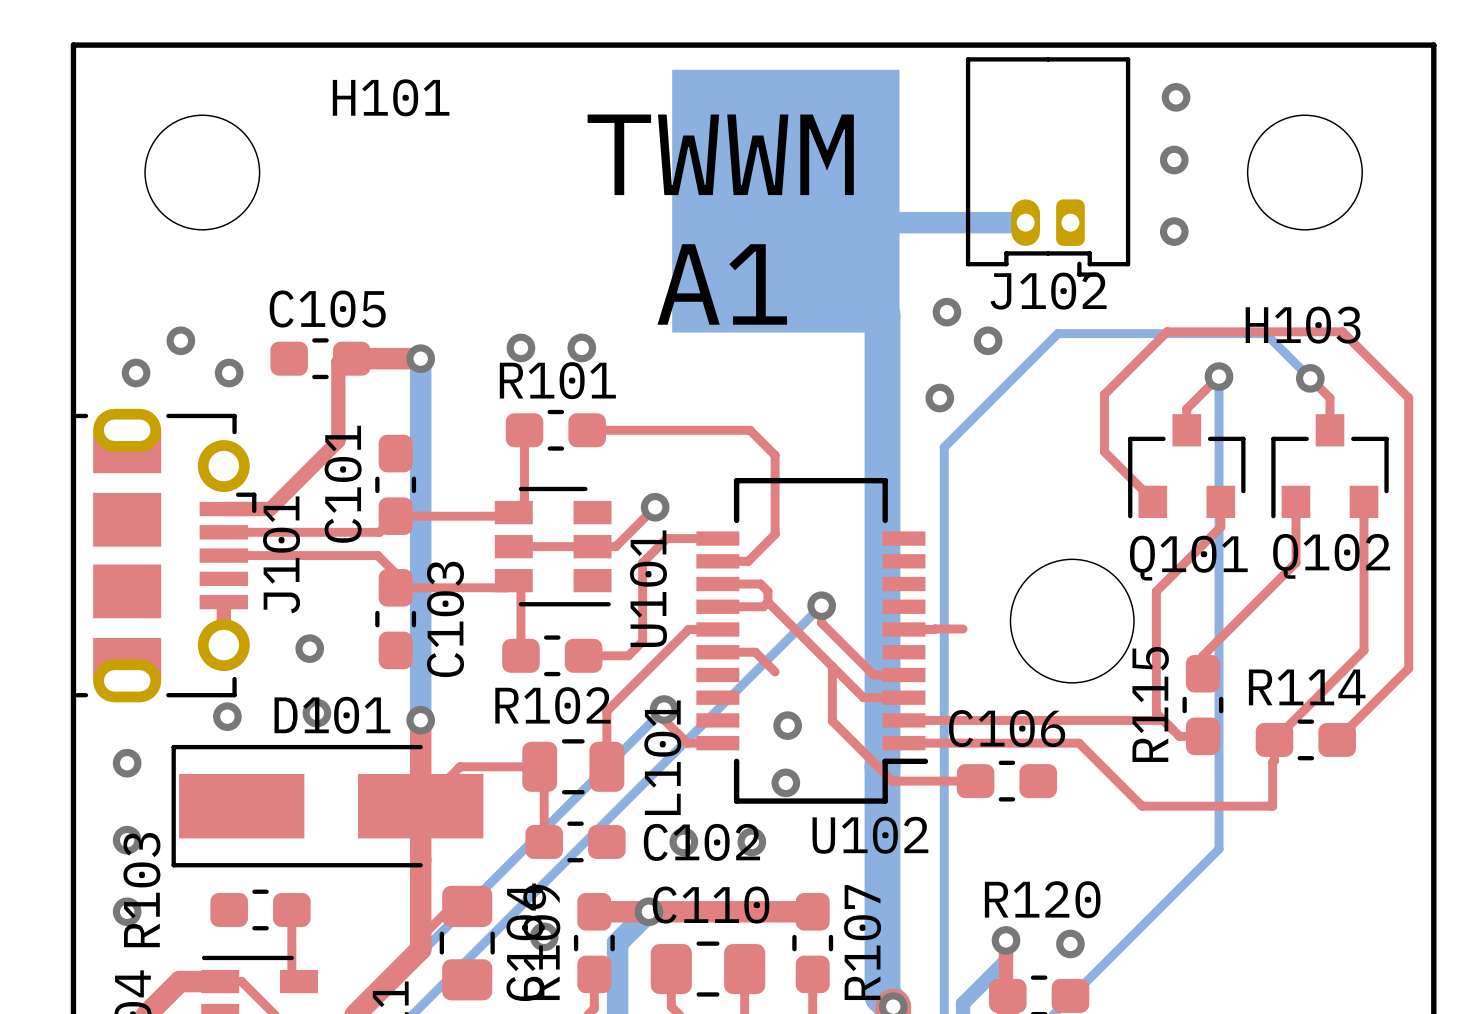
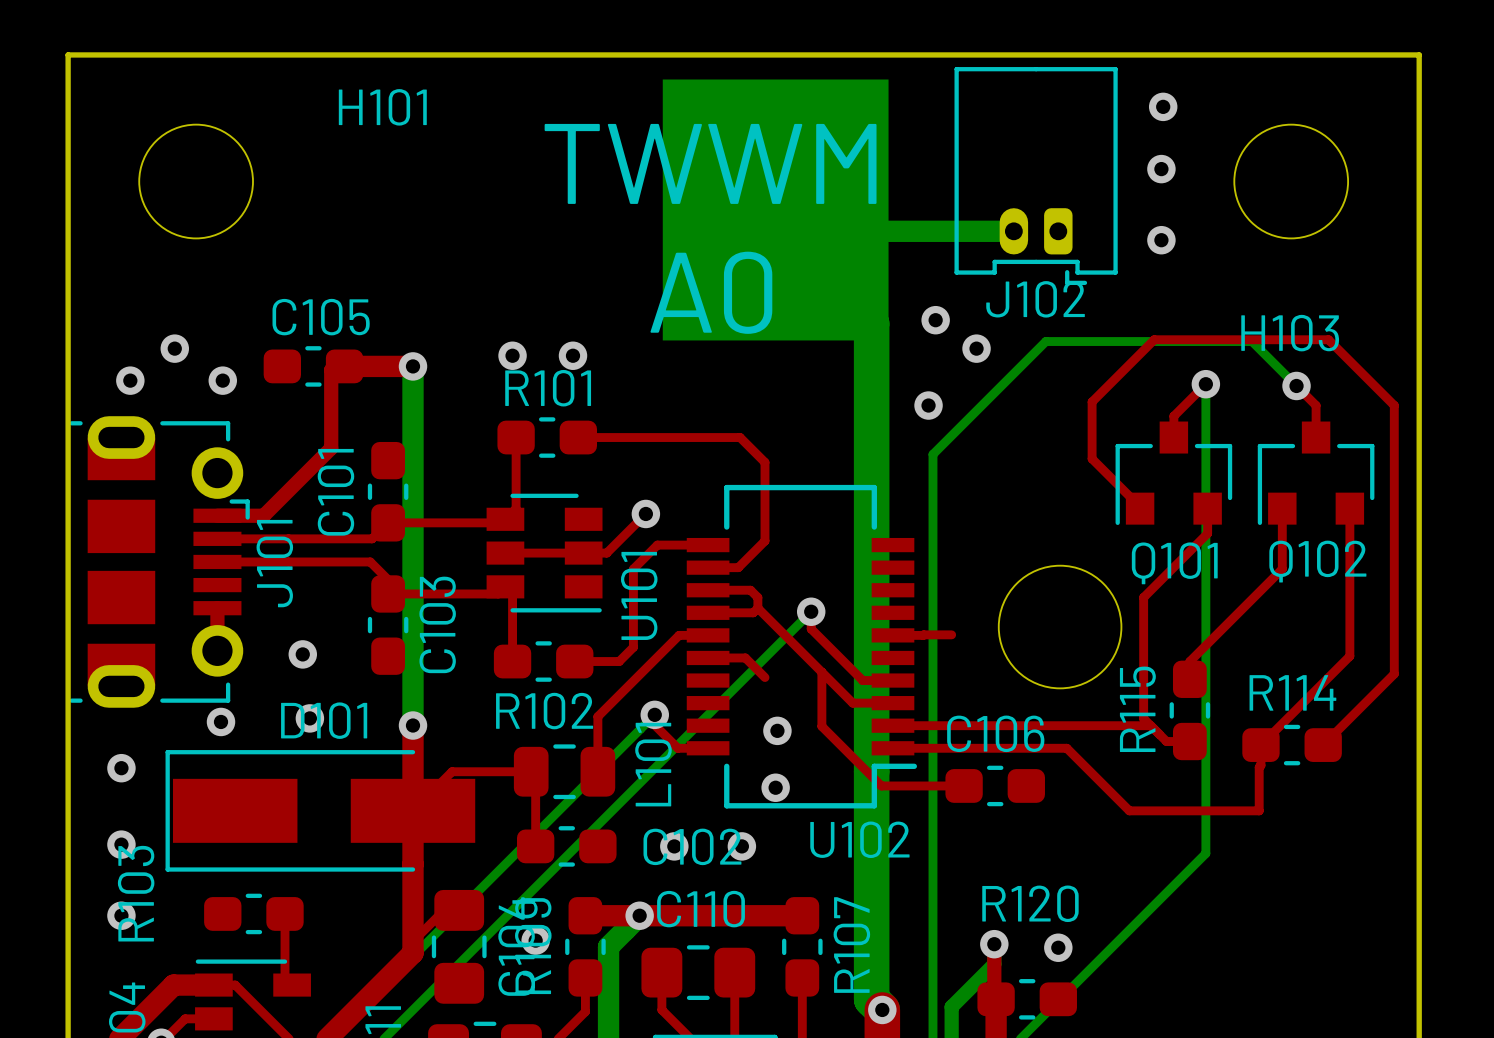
text: A1 (722, 284) -> A0 (711, 292)

